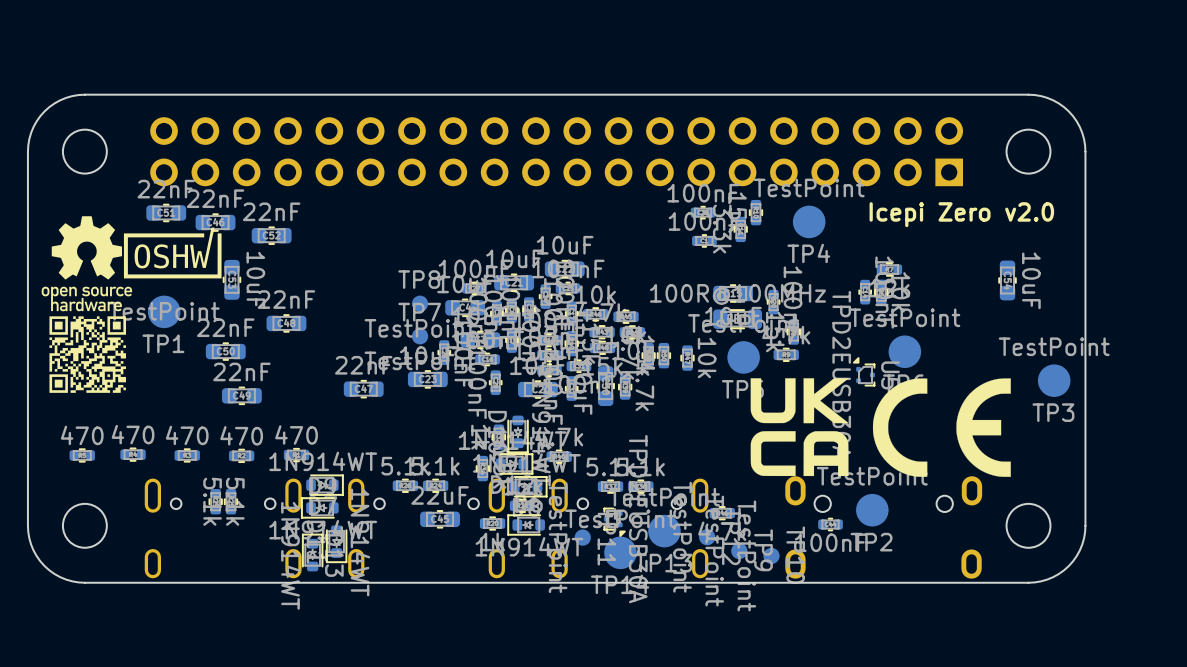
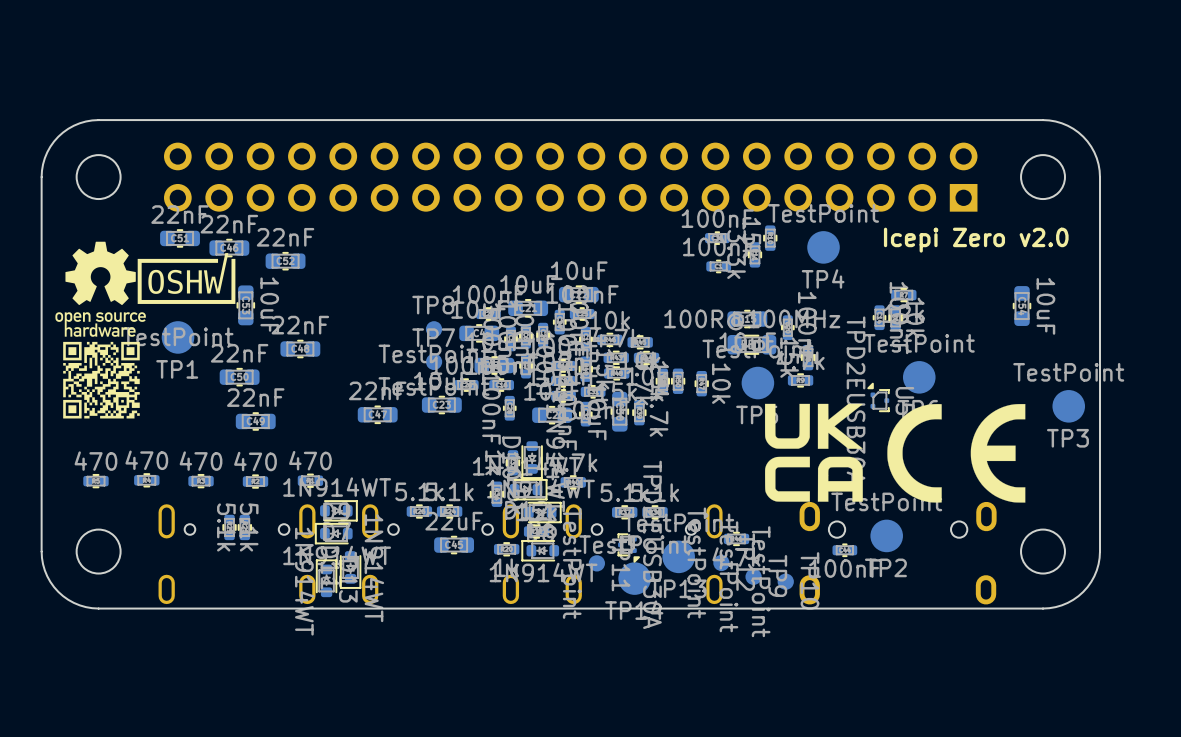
part rotation: 0° (444, 352) -> 90° clockwise (466, 385)

